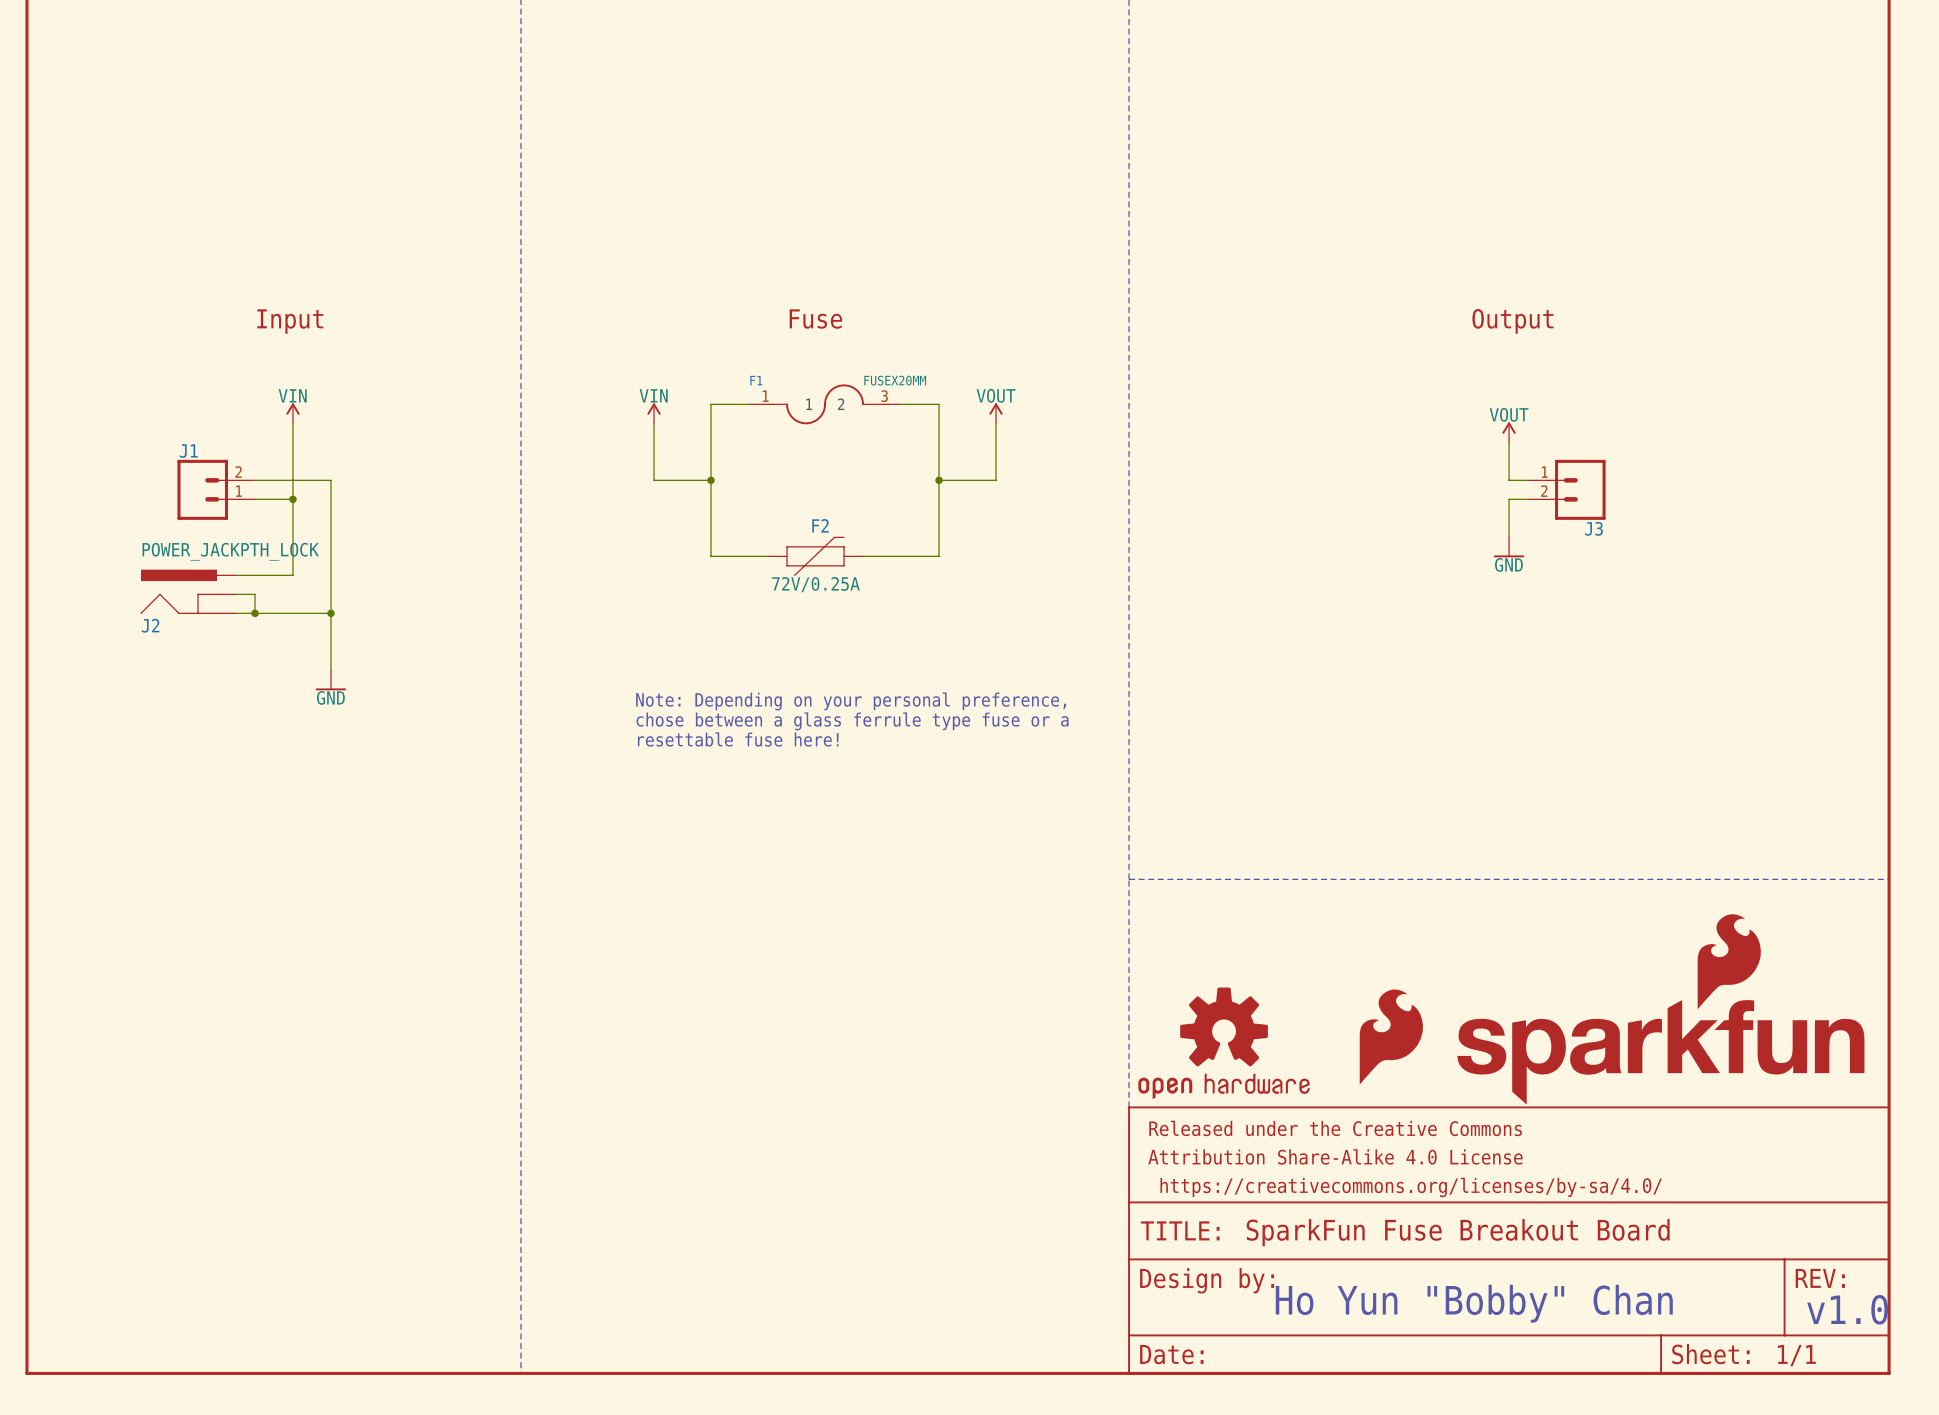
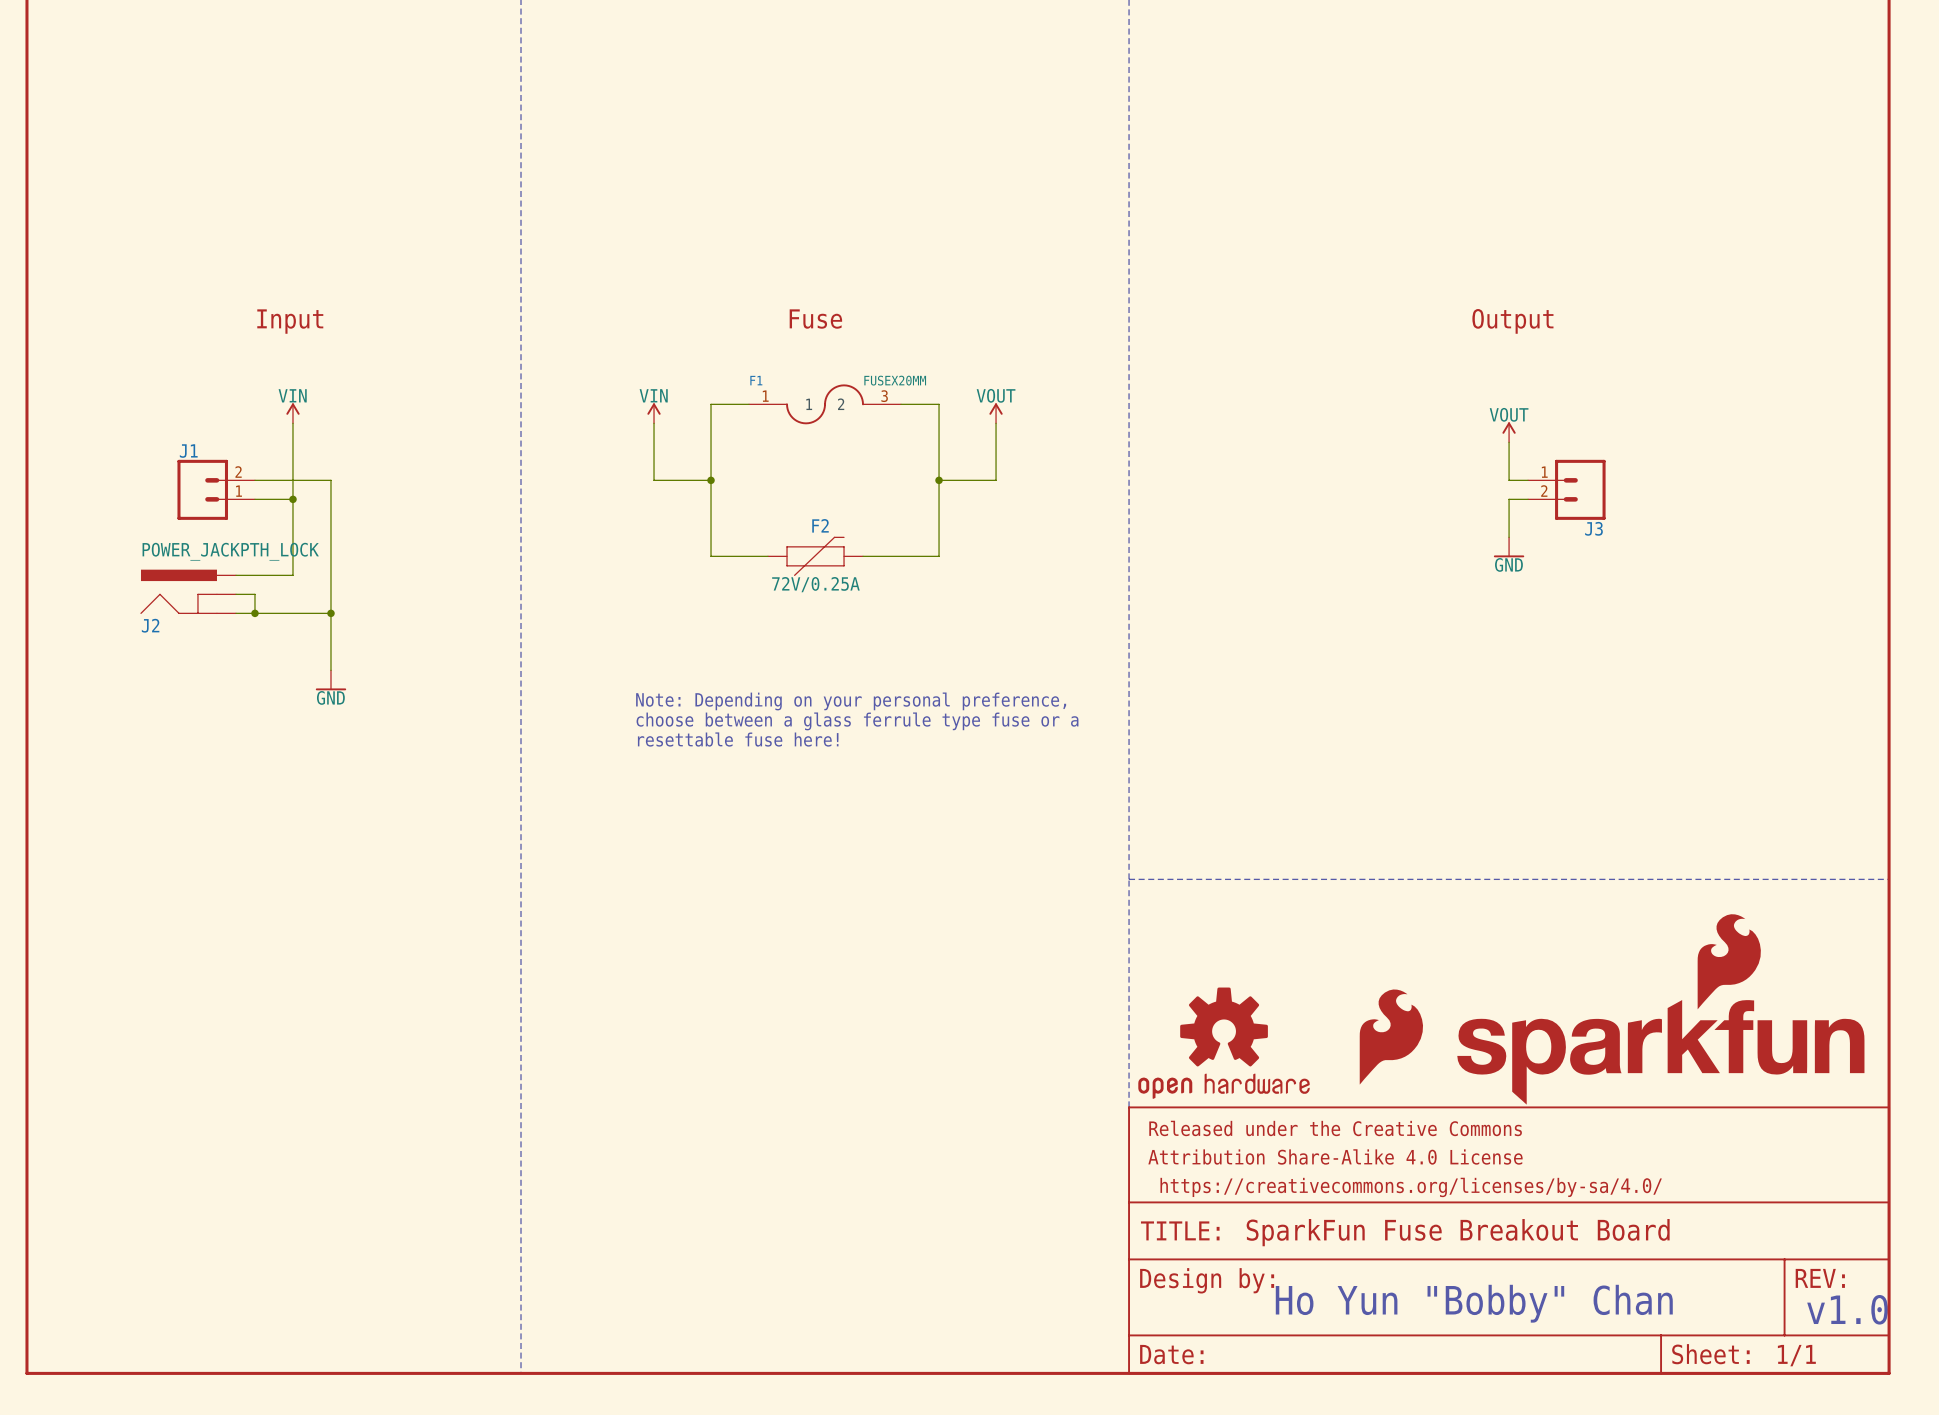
text: chose between a glass ferrule type fuse or a (852, 721) -> choose between a glass ferrule type fuse or a (857, 721)

